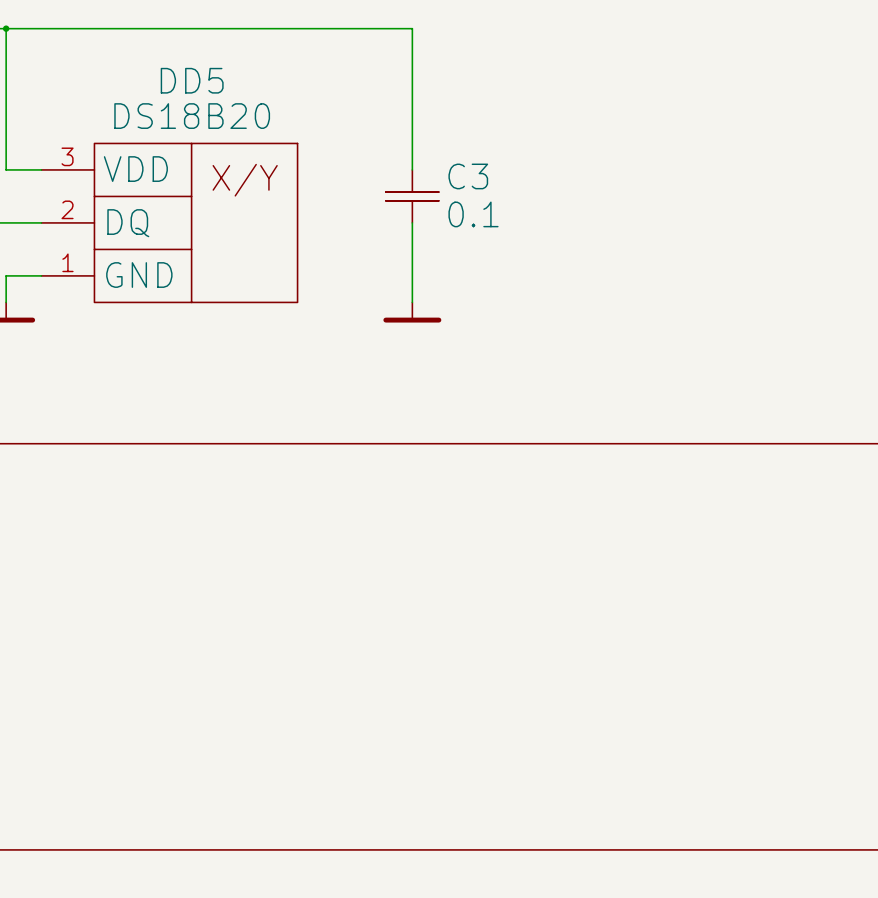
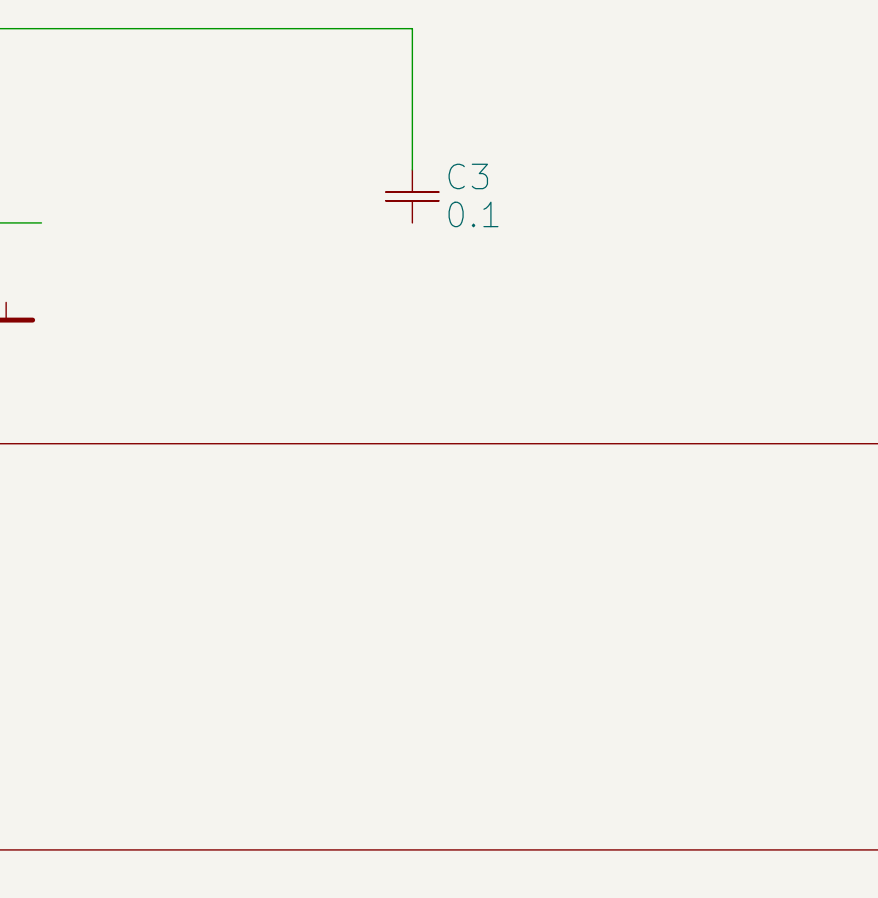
wire: (6, 28) (6, 169) (41, 169) -> none
junction: (6, 28) -> none
DD5: DS18B20 (169, 222) -> none
wire: (412, 222) (412, 302) -> none
wire: (41, 275) (6, 275) (6, 302) -> none
power symbol: (412, 312) -> none

